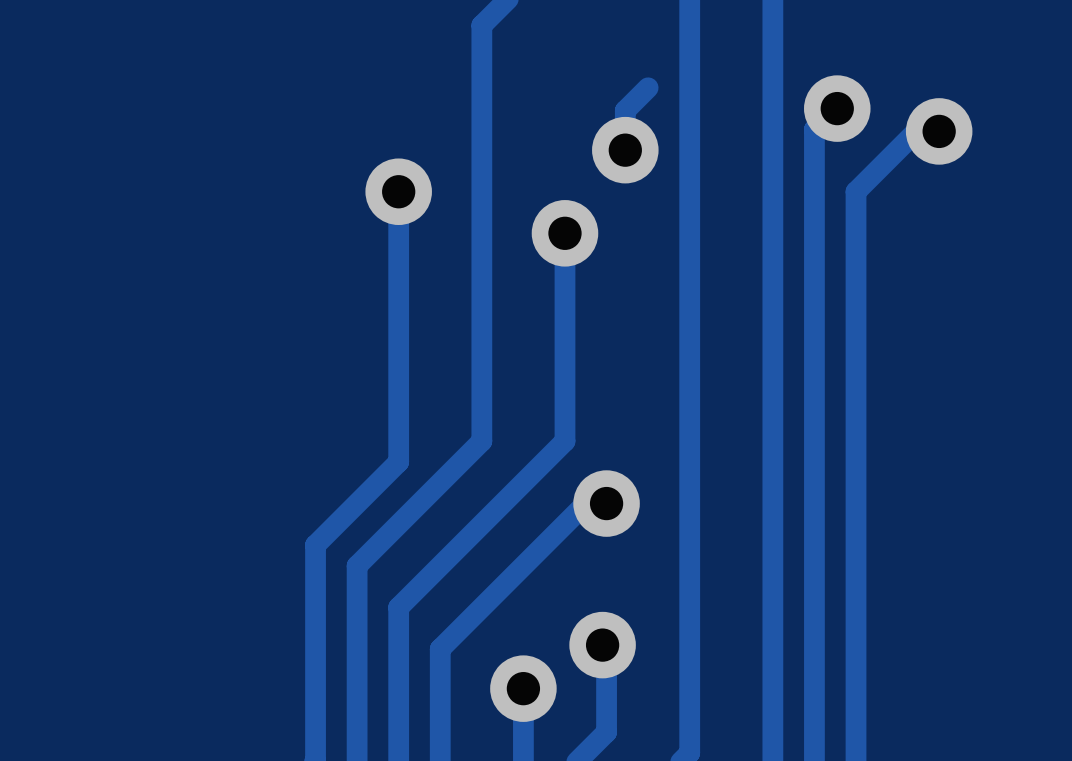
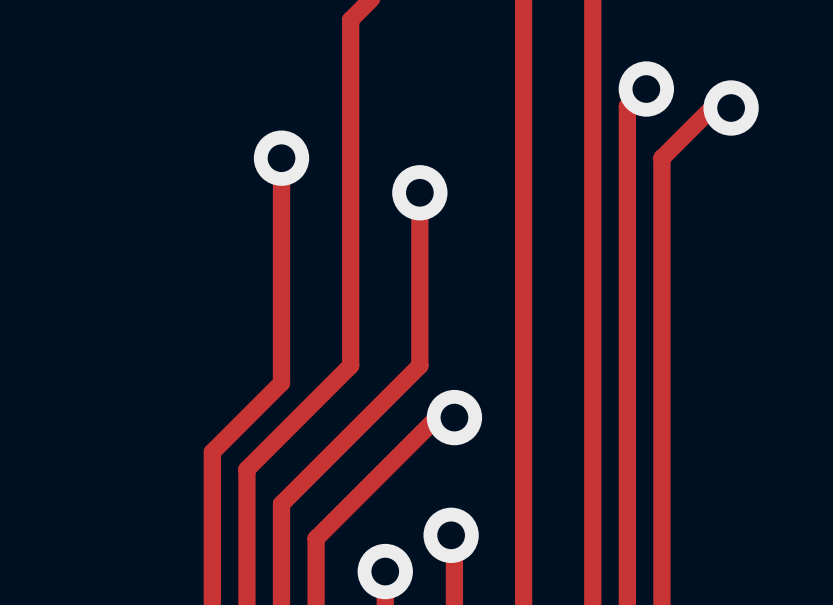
track: (648, 87) (625, 110) (625, 150) -> none
via: (625, 150) -> none

